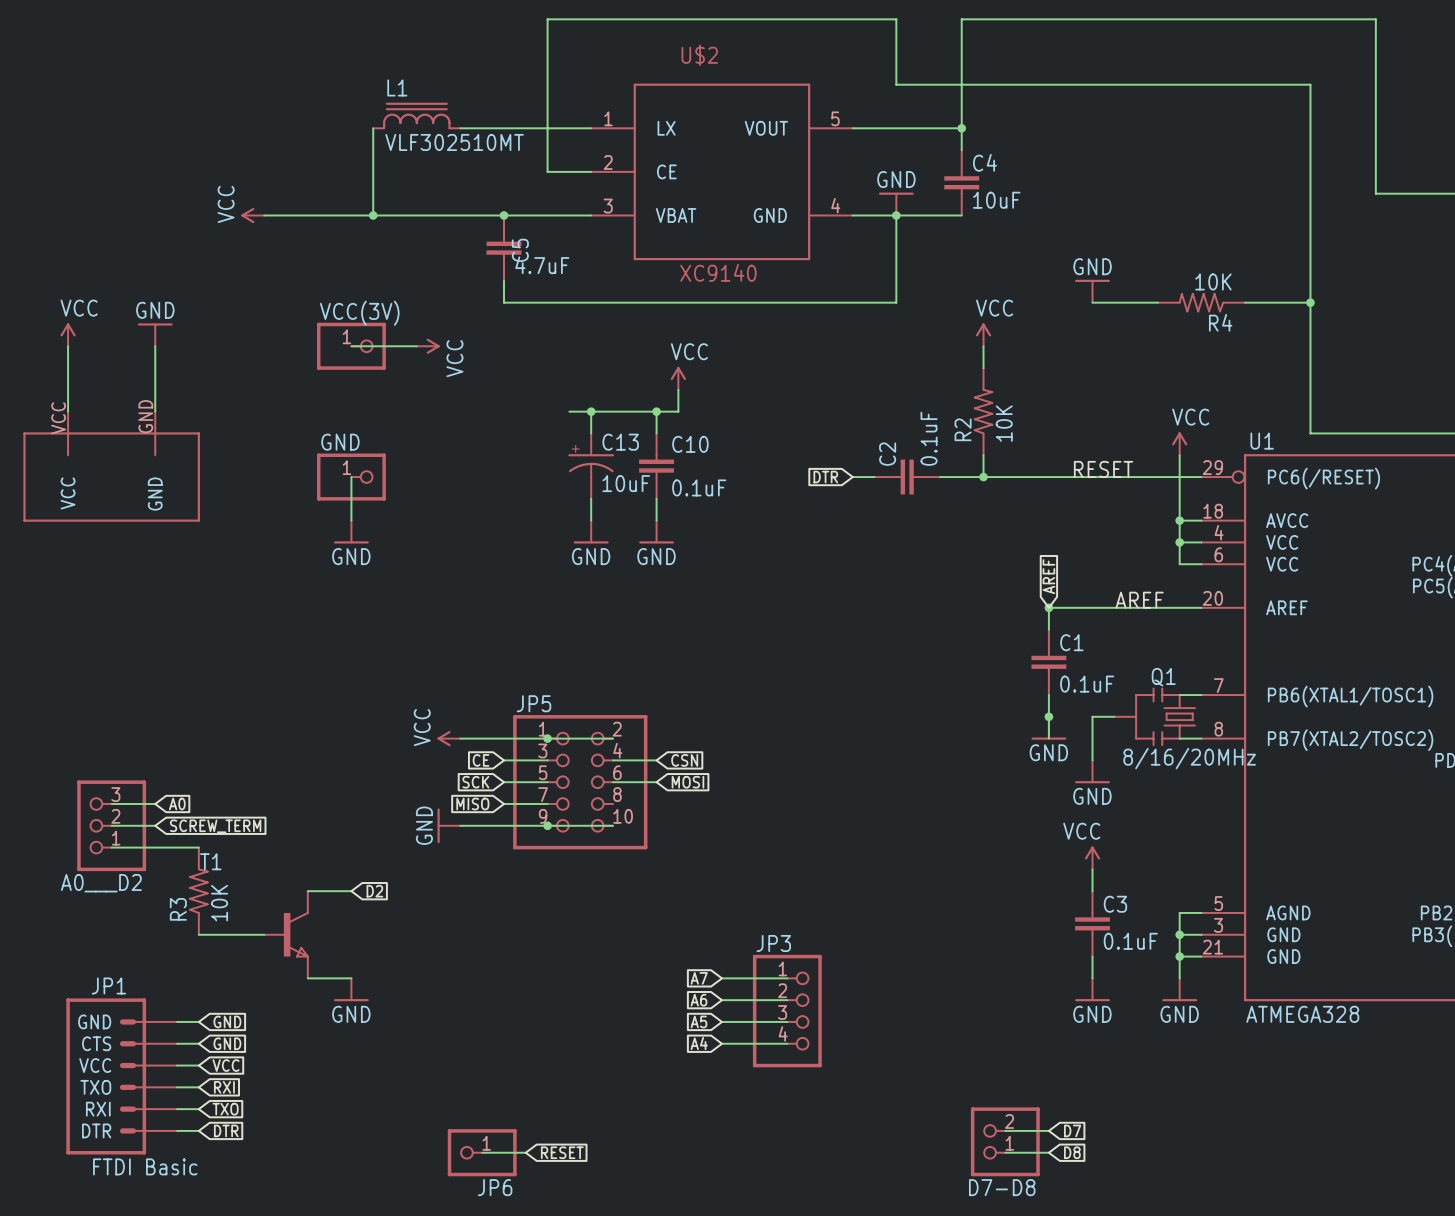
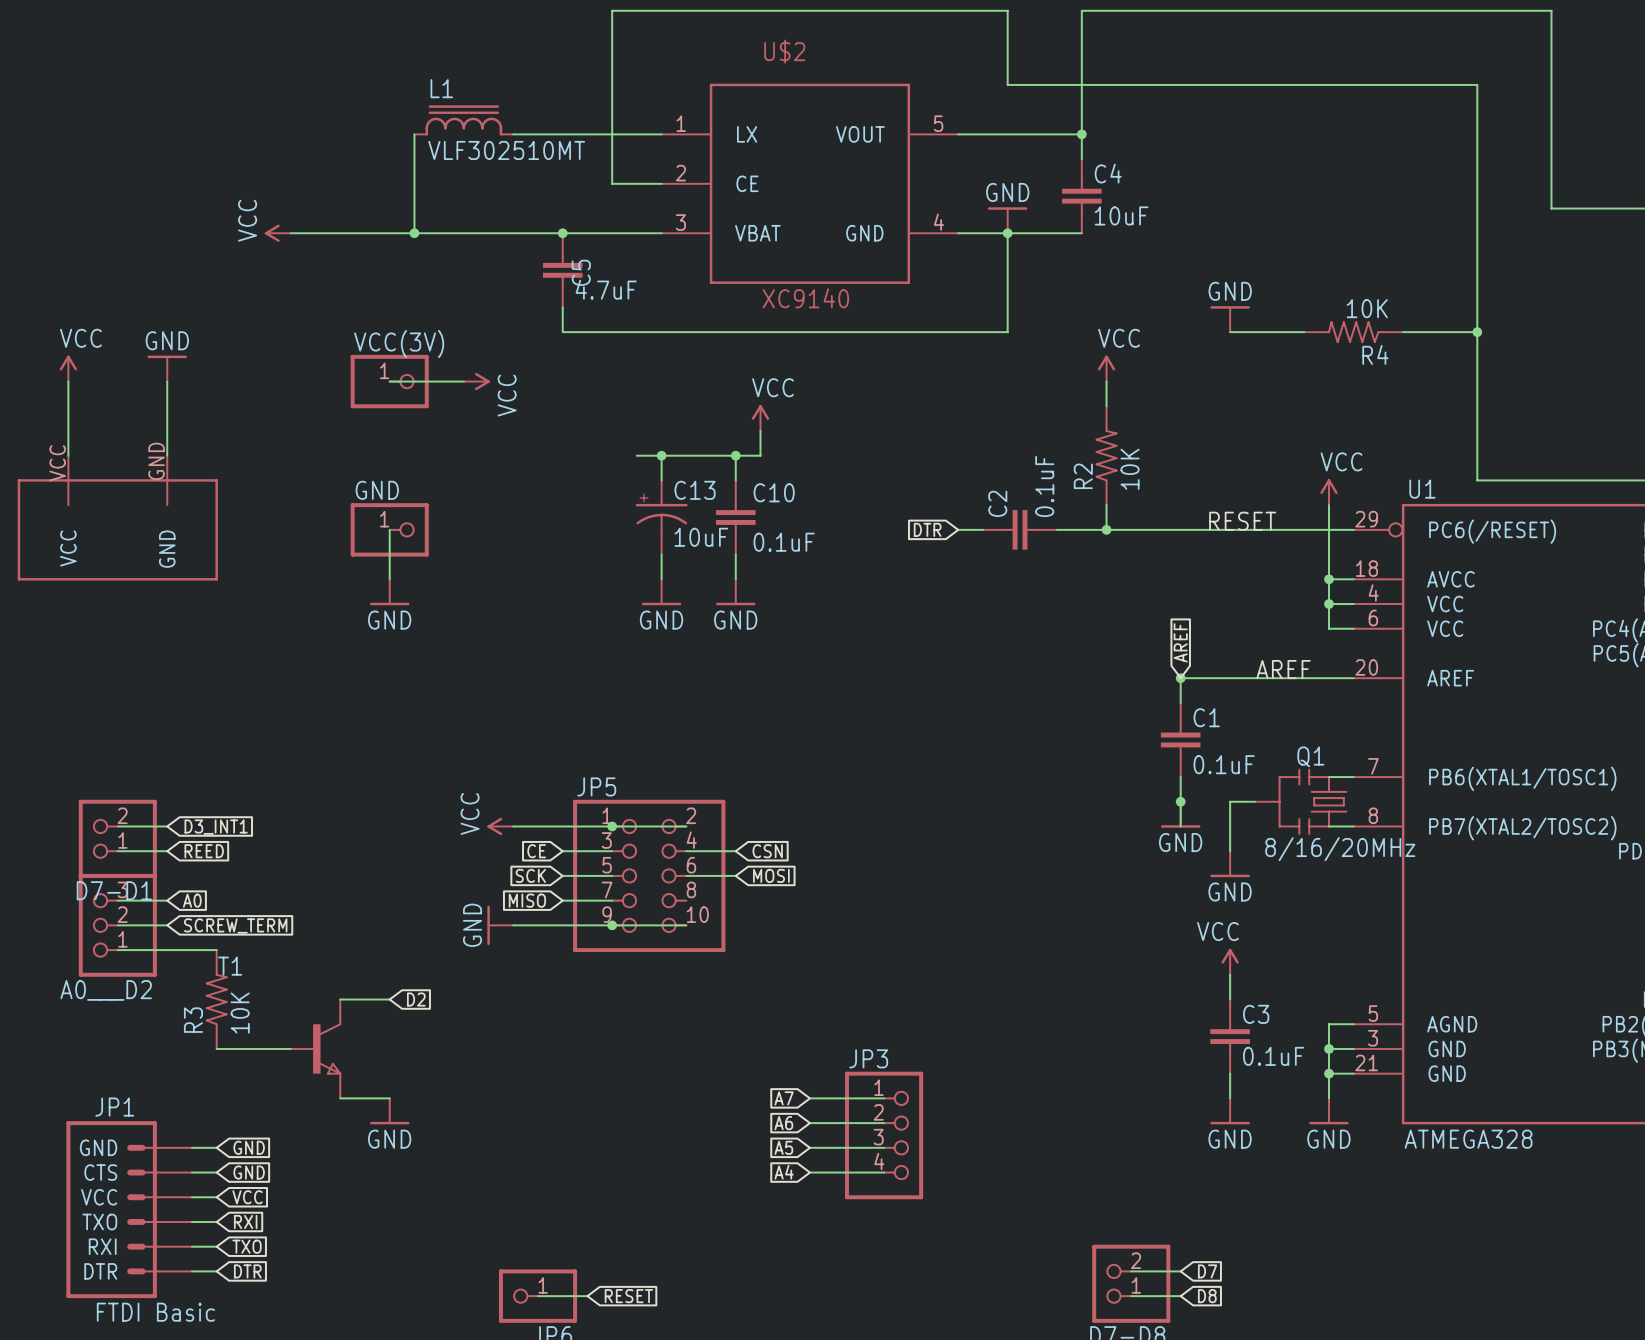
wire: none -> (117, 826) (167, 826)
global label: none -> D3_INT1 (216, 827)
D7-D1: none -> (117, 838)
wire: none -> (117, 851) (167, 851)
global label: none -> REED (204, 851)

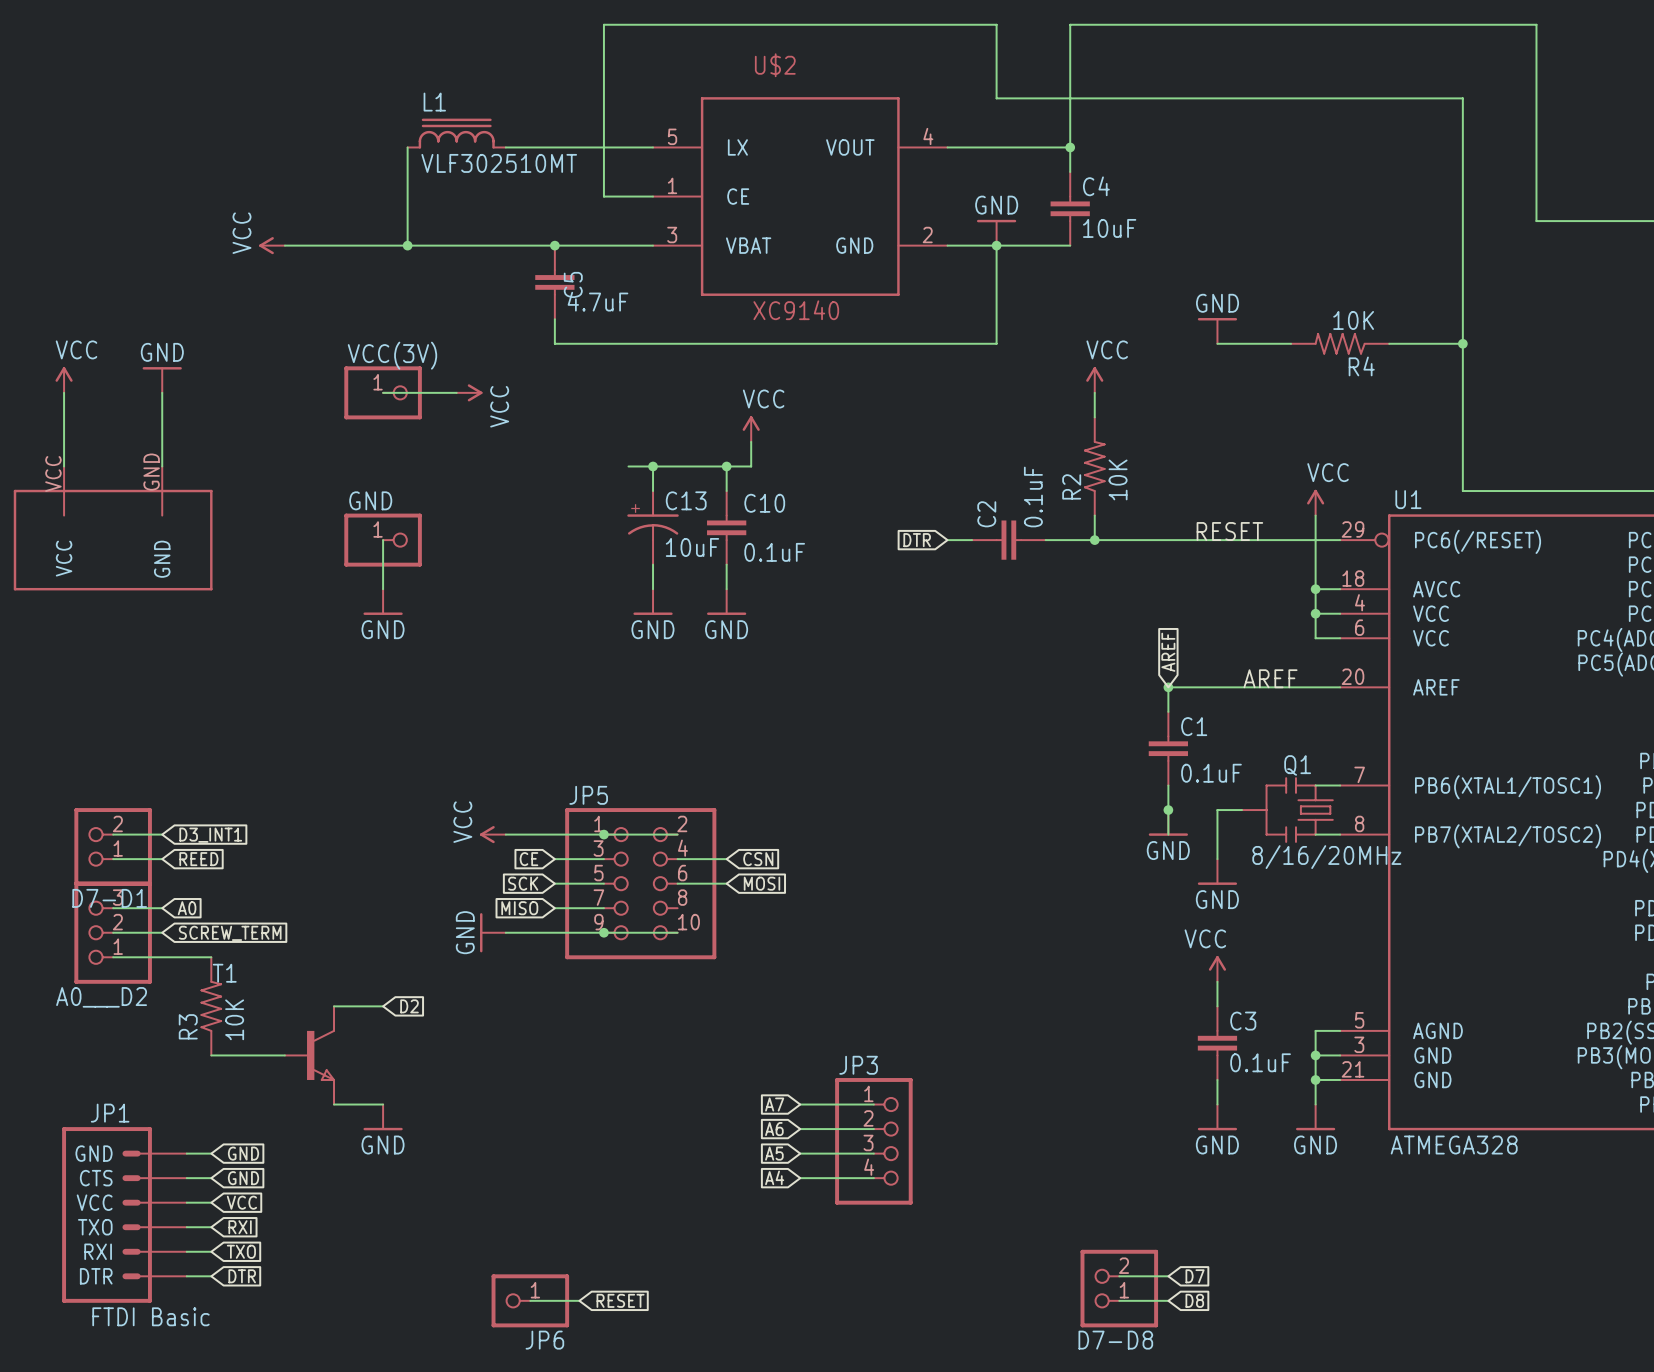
U$2 pin number: 1 (681, 123) -> 5 (672, 136)
U$2 pin number: 5 (938, 123) -> 4 (928, 136)
U$2 pin number: 2 (680, 173) -> 1 (672, 185)
U$2 pin number: 4 (938, 222) -> 2 (927, 234)

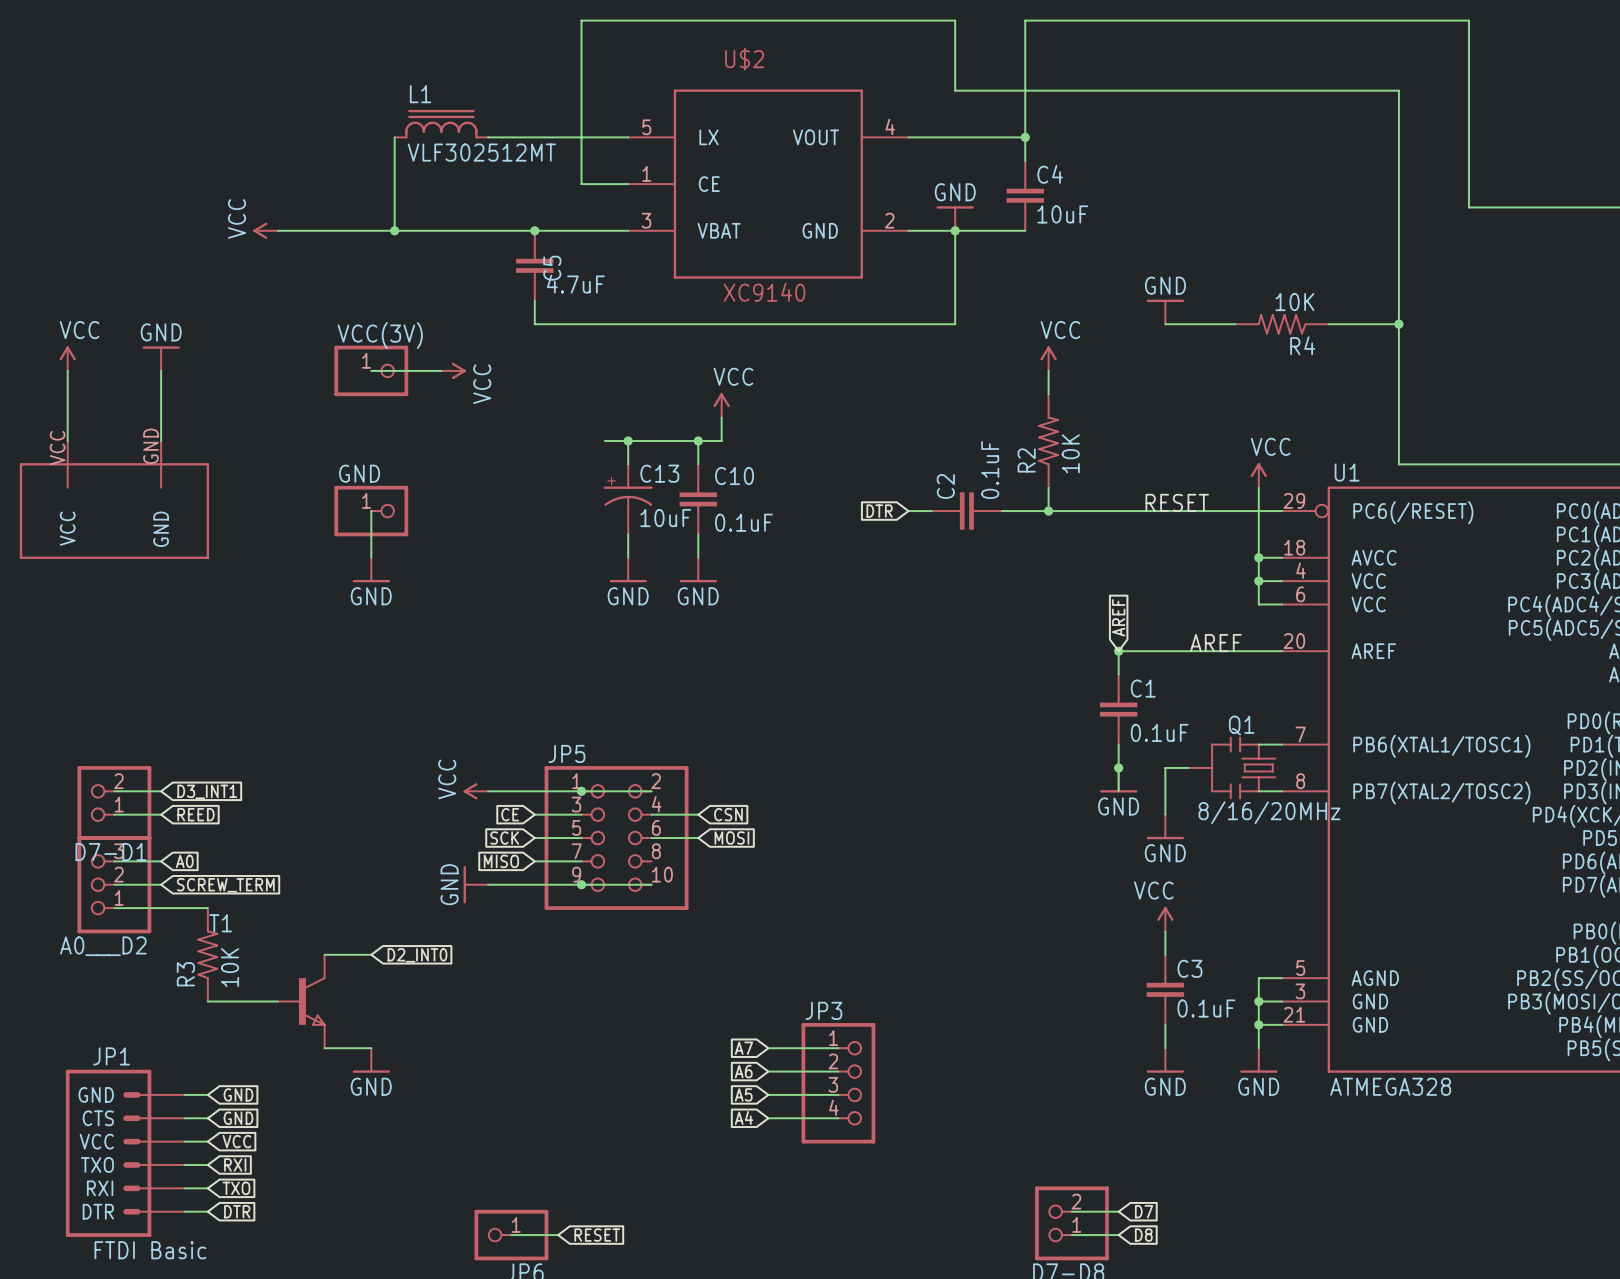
L1 value: VLF302510MT (499, 163) -> VLF302512MT (481, 152)
global label: D2 (409, 1006) -> D2_INT0 (417, 955)

